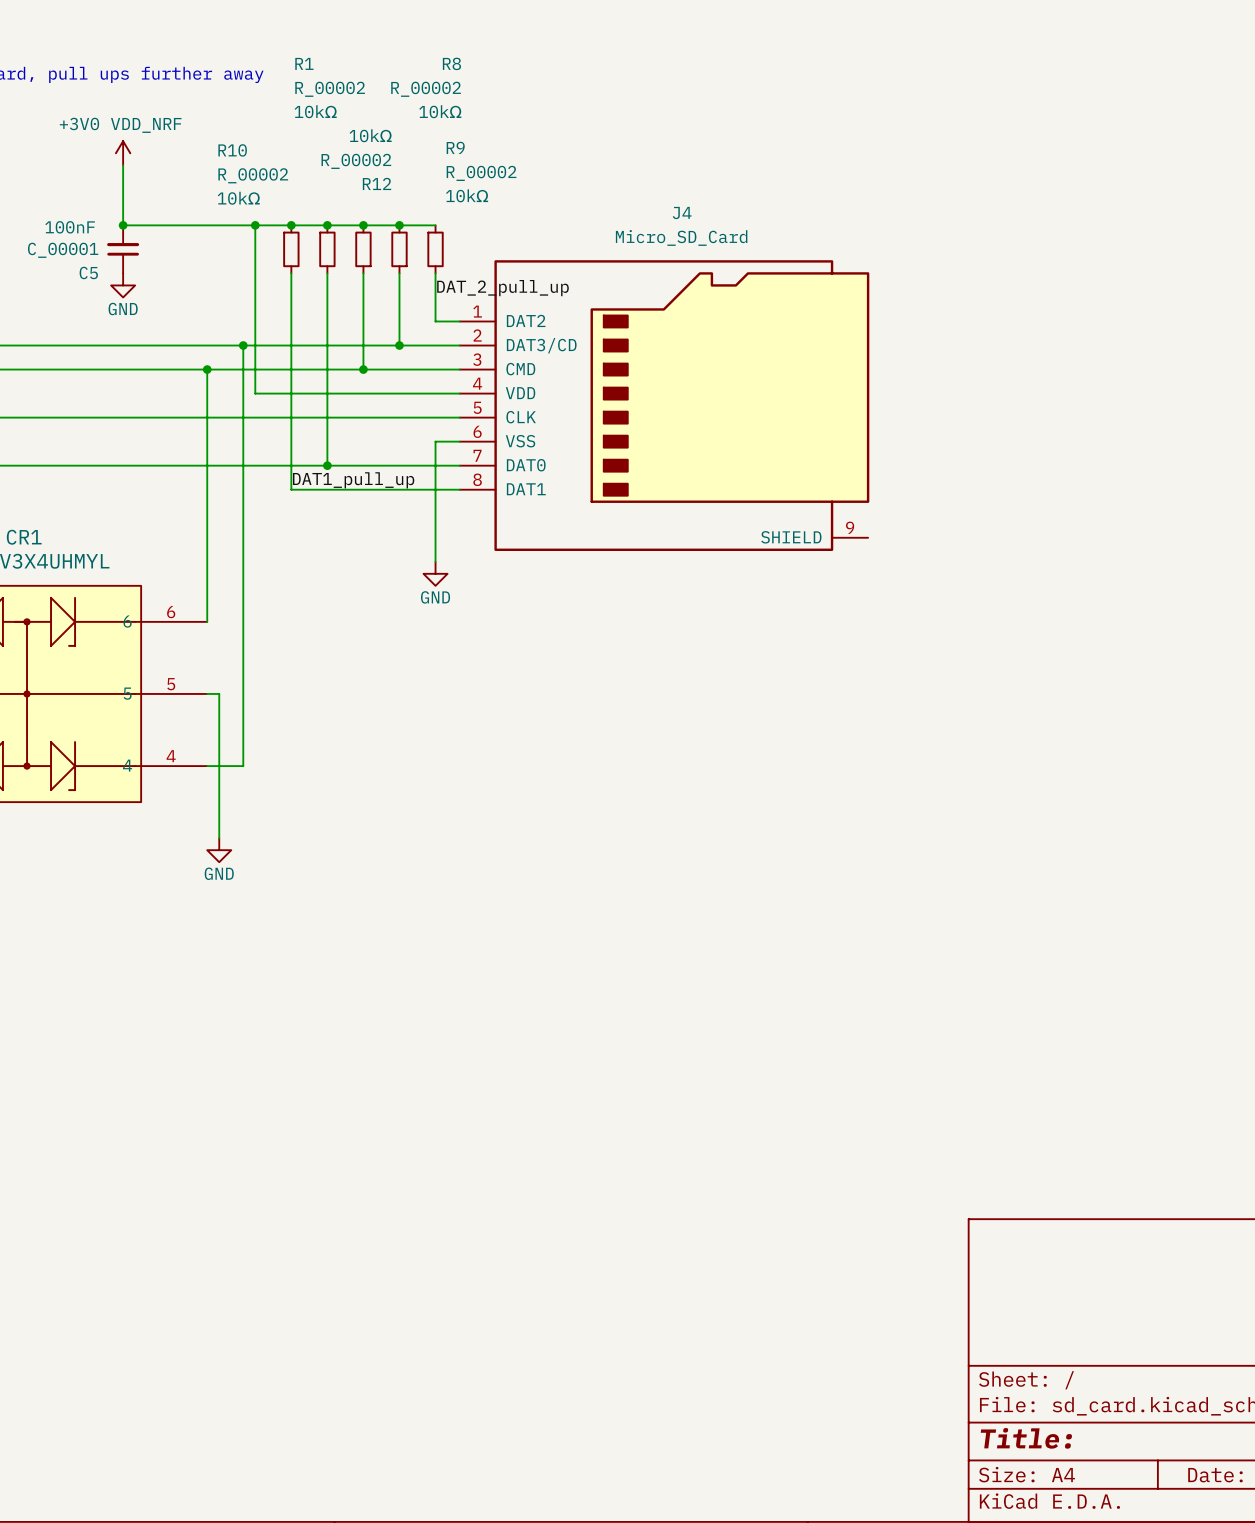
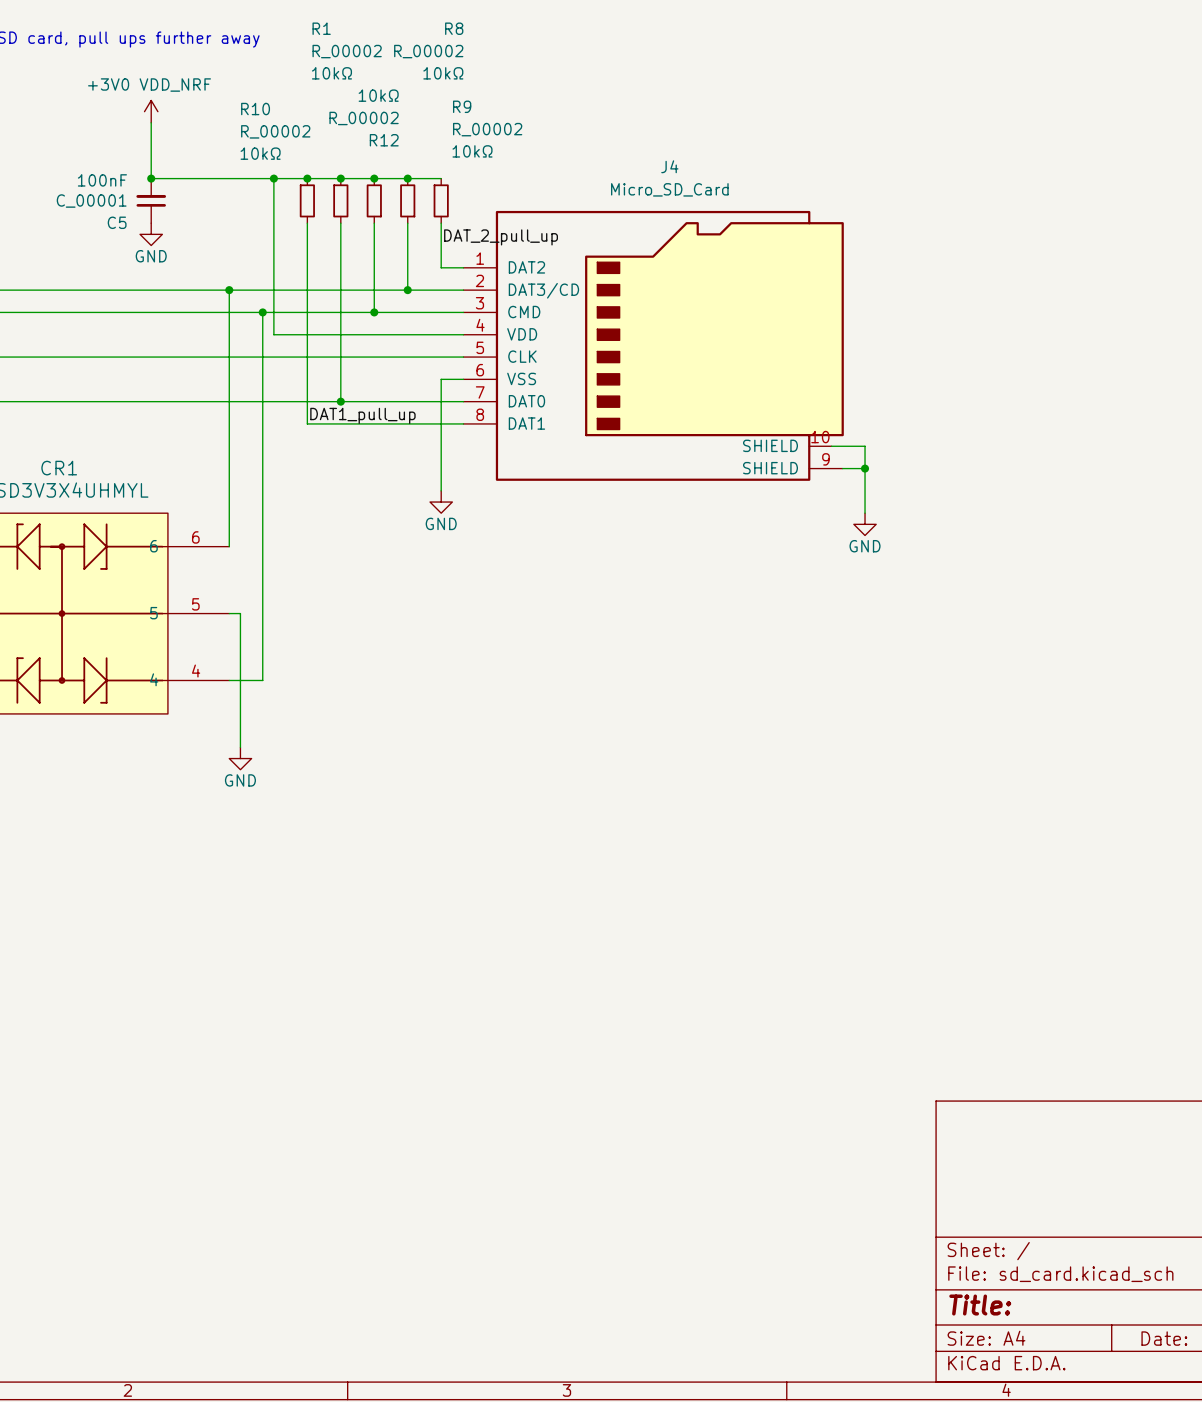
J4 symbol: [459, 260, 870, 551] -> [463, 210, 844, 481]
junction: none -> (229, 290)
wire: (243, 345) (243, 369) -> (229, 290) (229, 312)
junction: (243, 345) -> none
junction: (207, 369) -> none
junction: none -> (262, 312)
wire: none -> (831, 446) (865, 446) (865, 513)
wire: none -> (842, 468) (865, 468)
junction: none -> (865, 468)
power symbol: none -> GND (865, 524)

